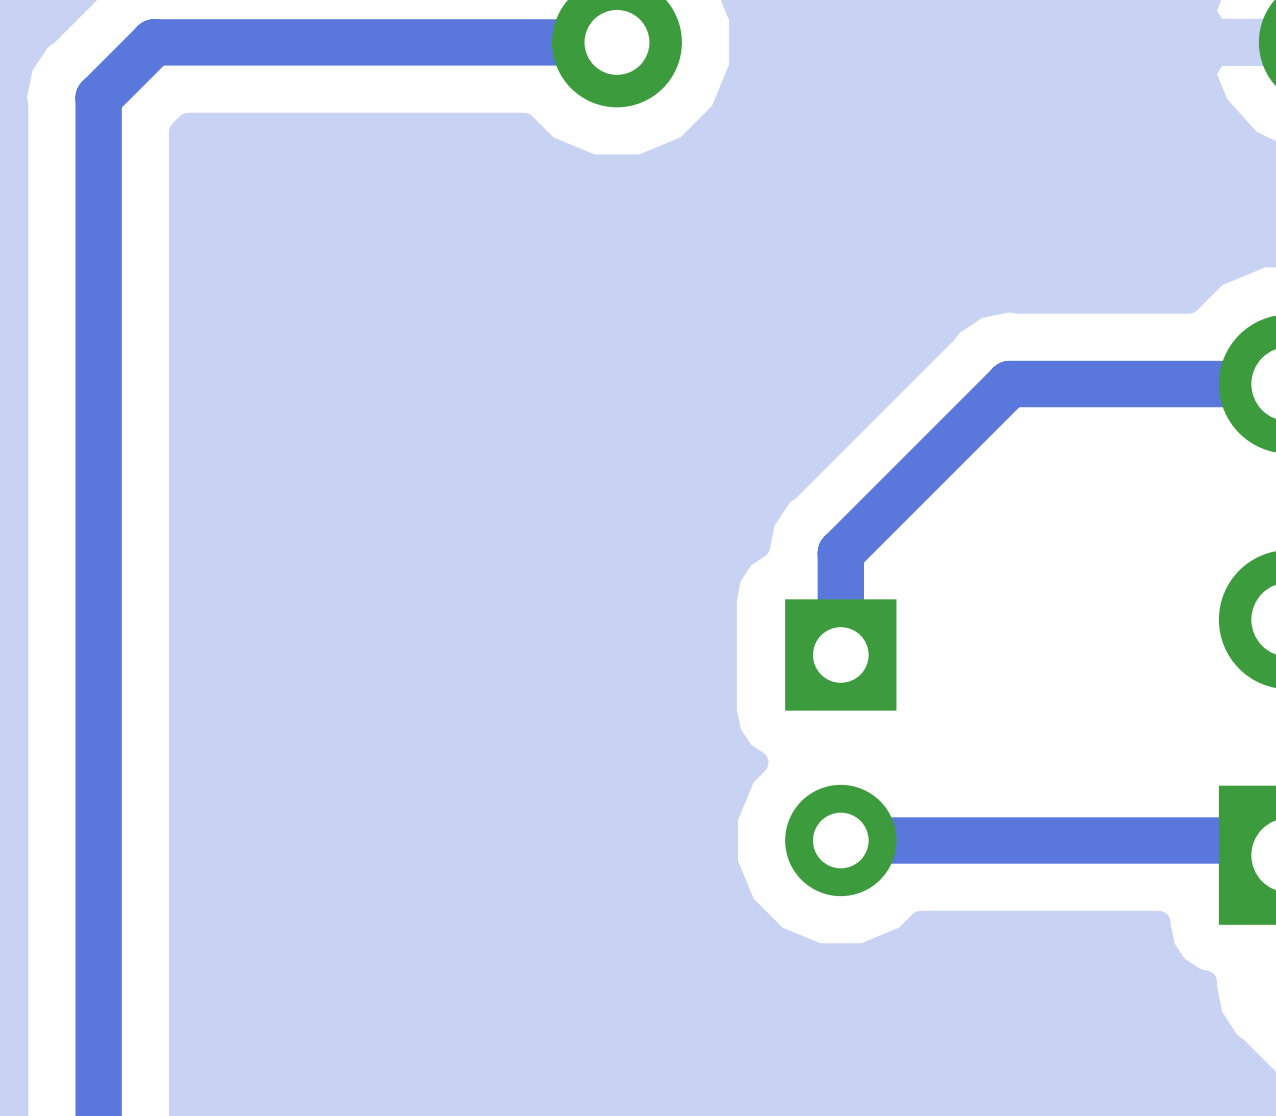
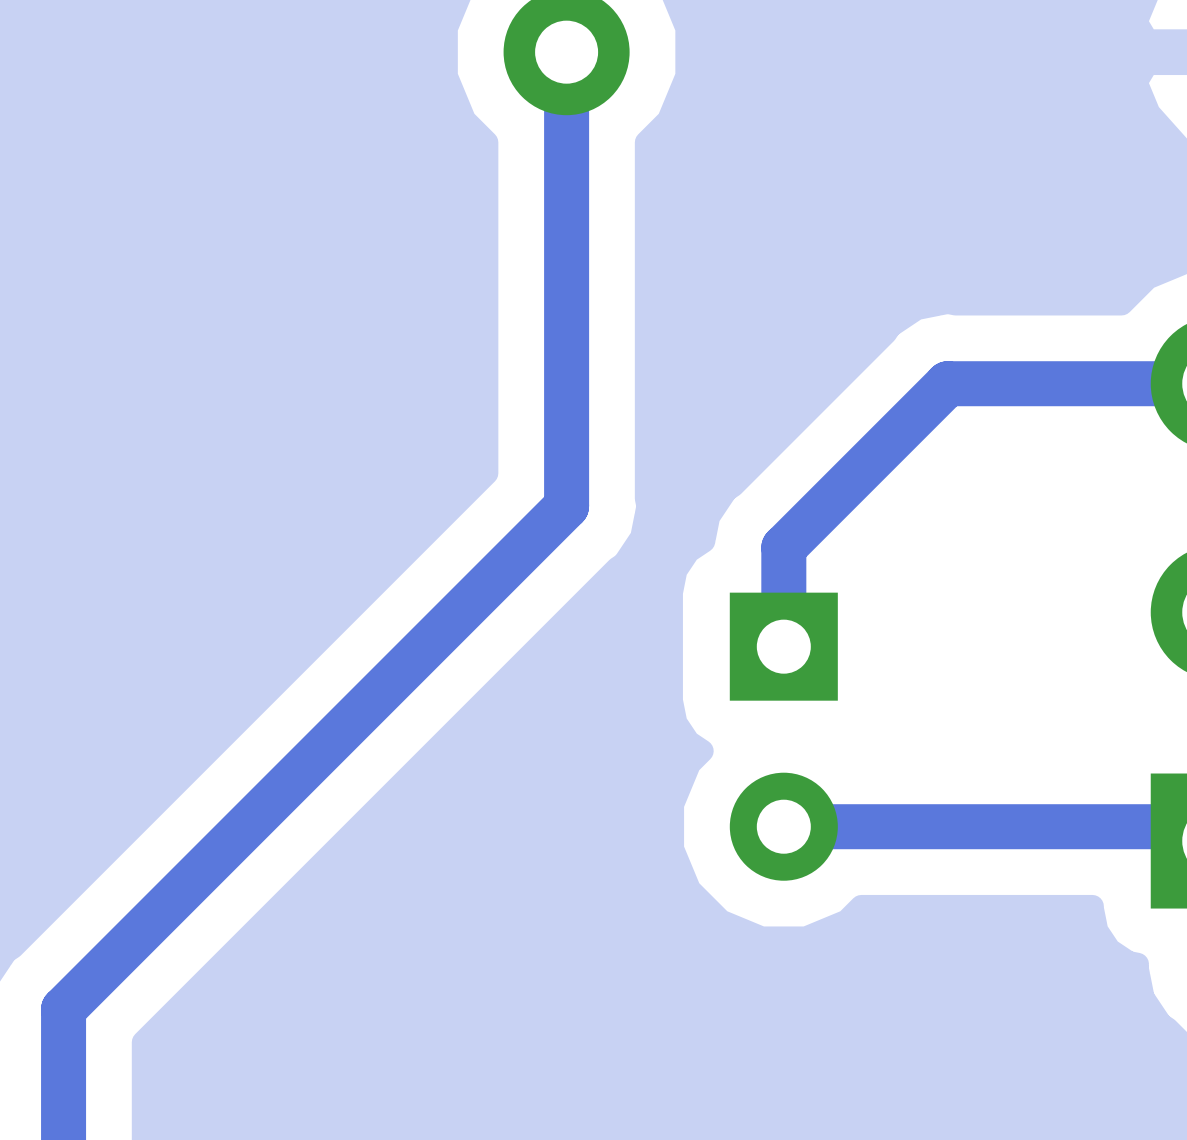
track: (616, 42) (154, 42) (98, 97) (98, 1028) -> (566, 52) (566, 506) (63, 1009)

